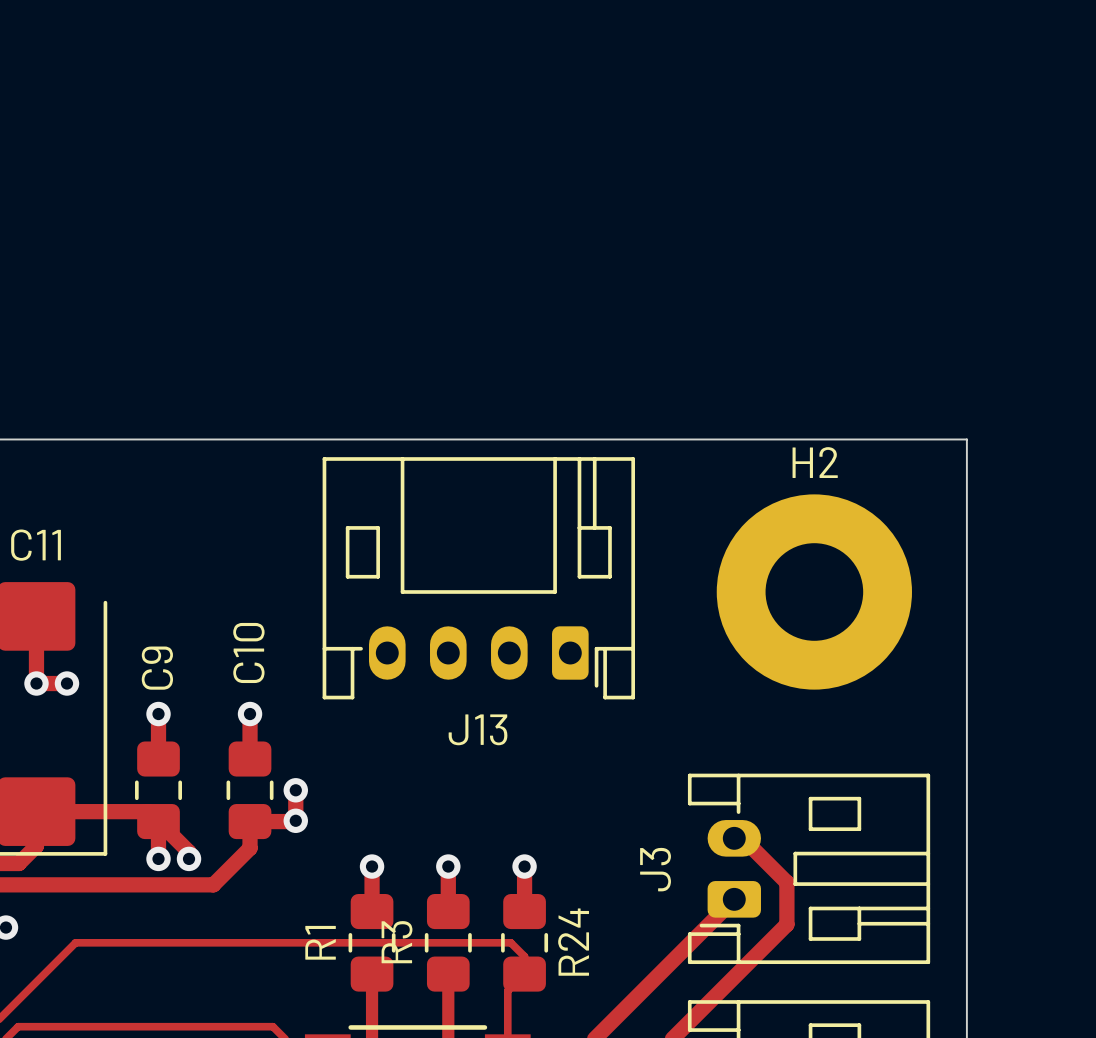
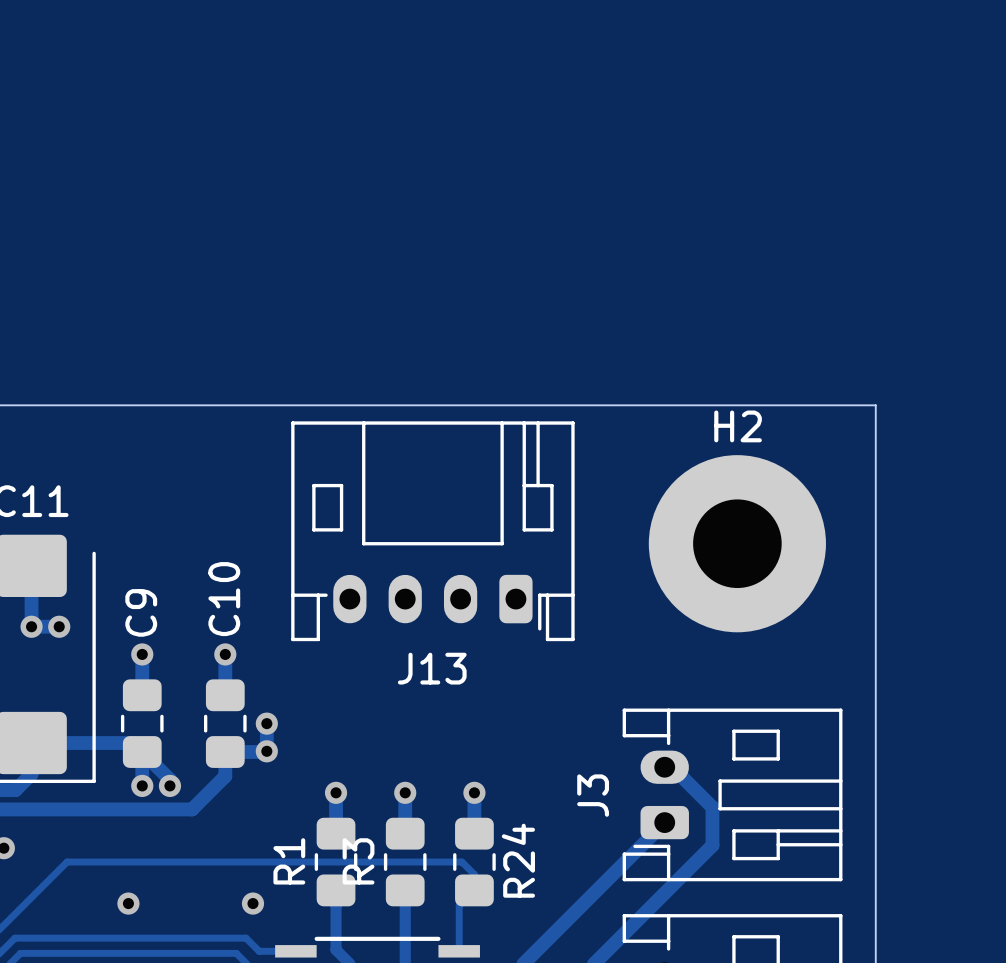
via: none -> (128, 903)
via: none -> (252, 903)

